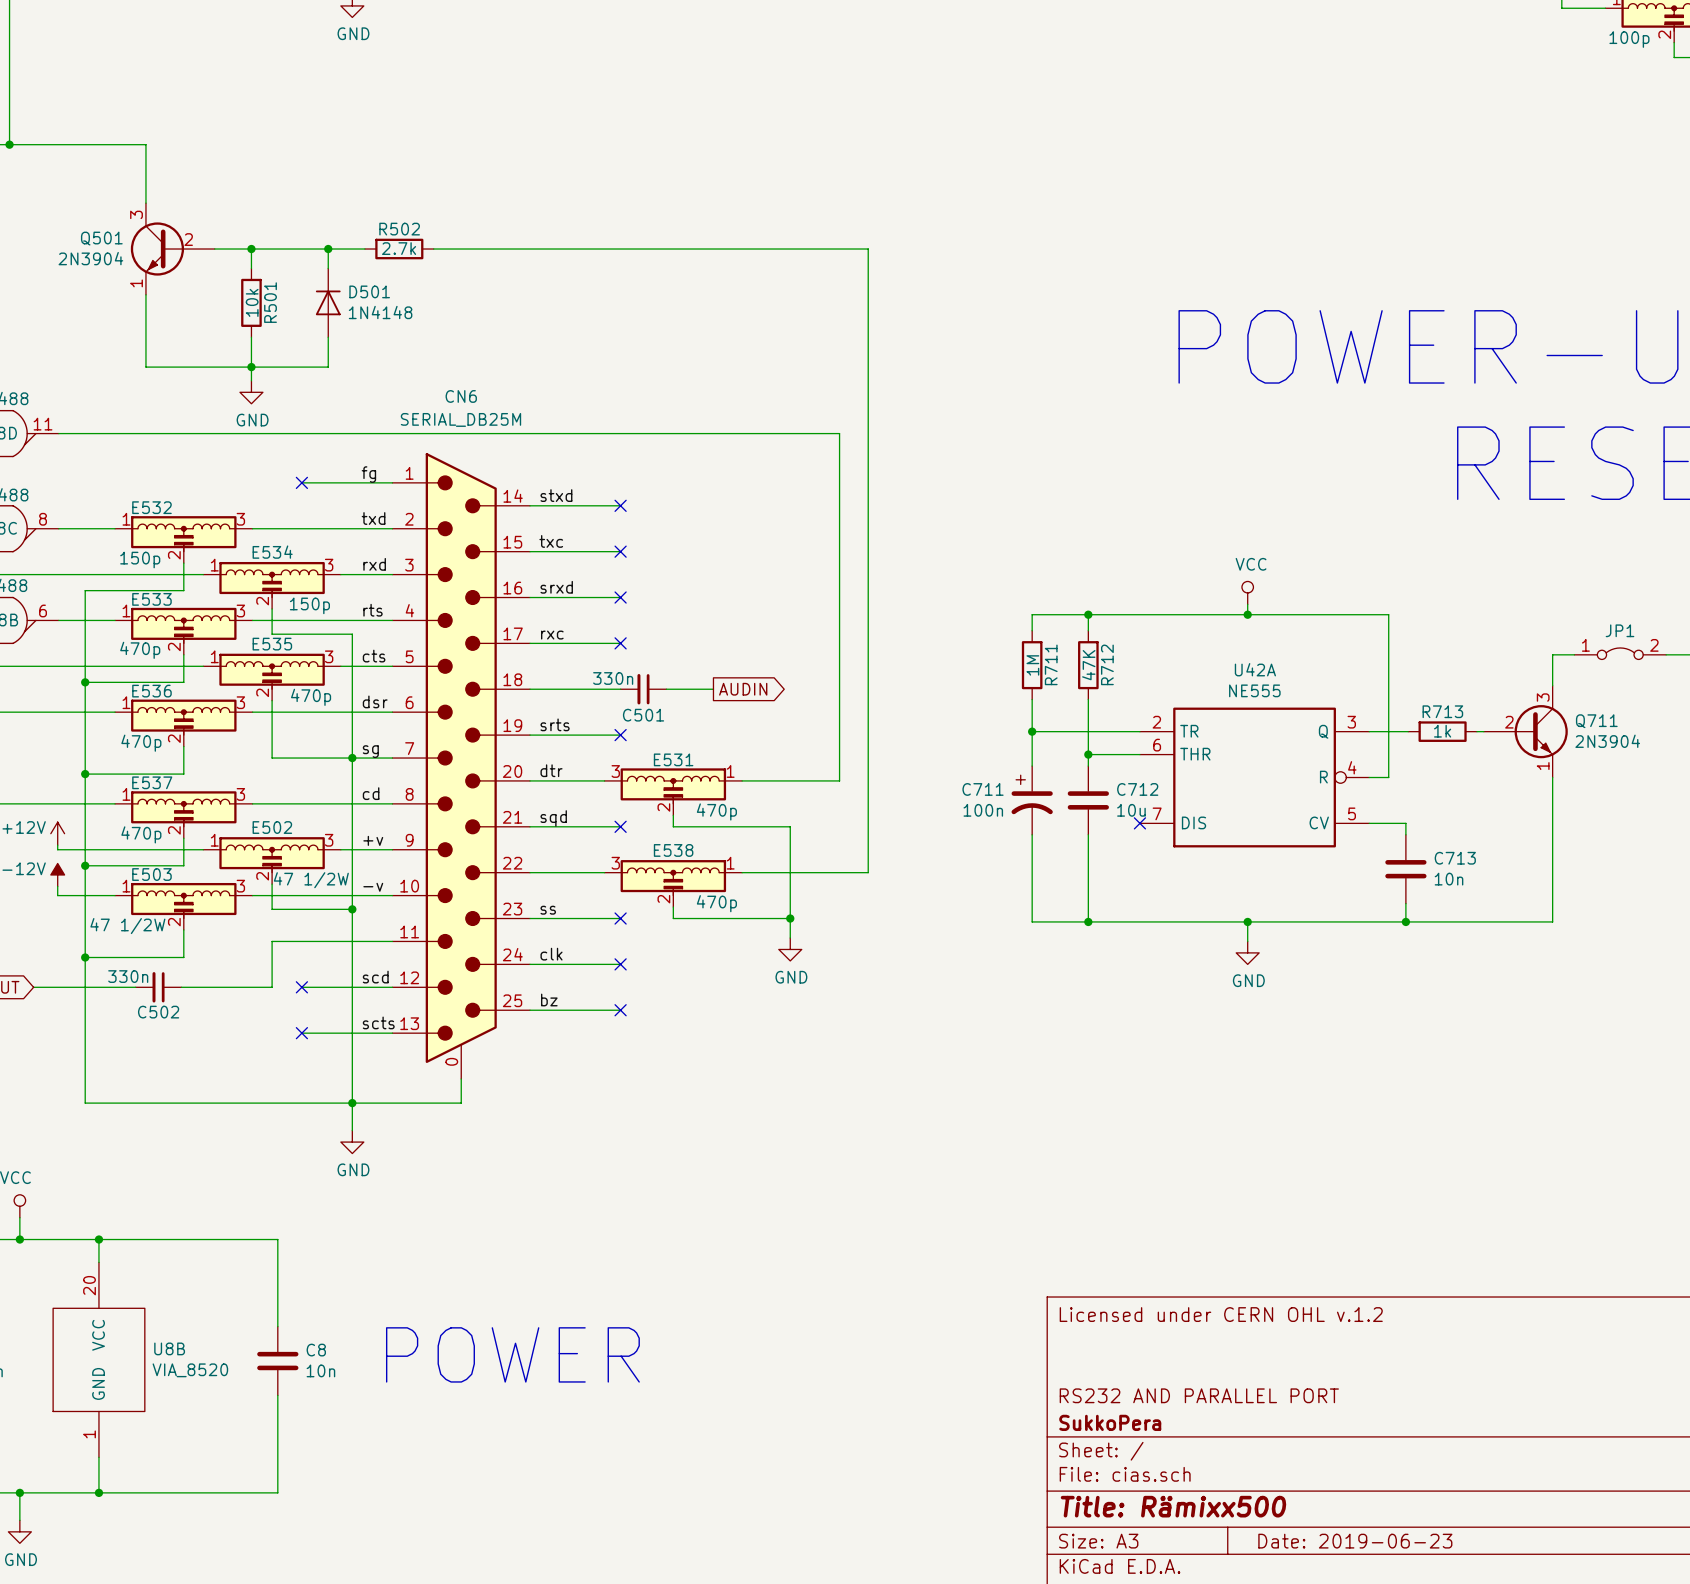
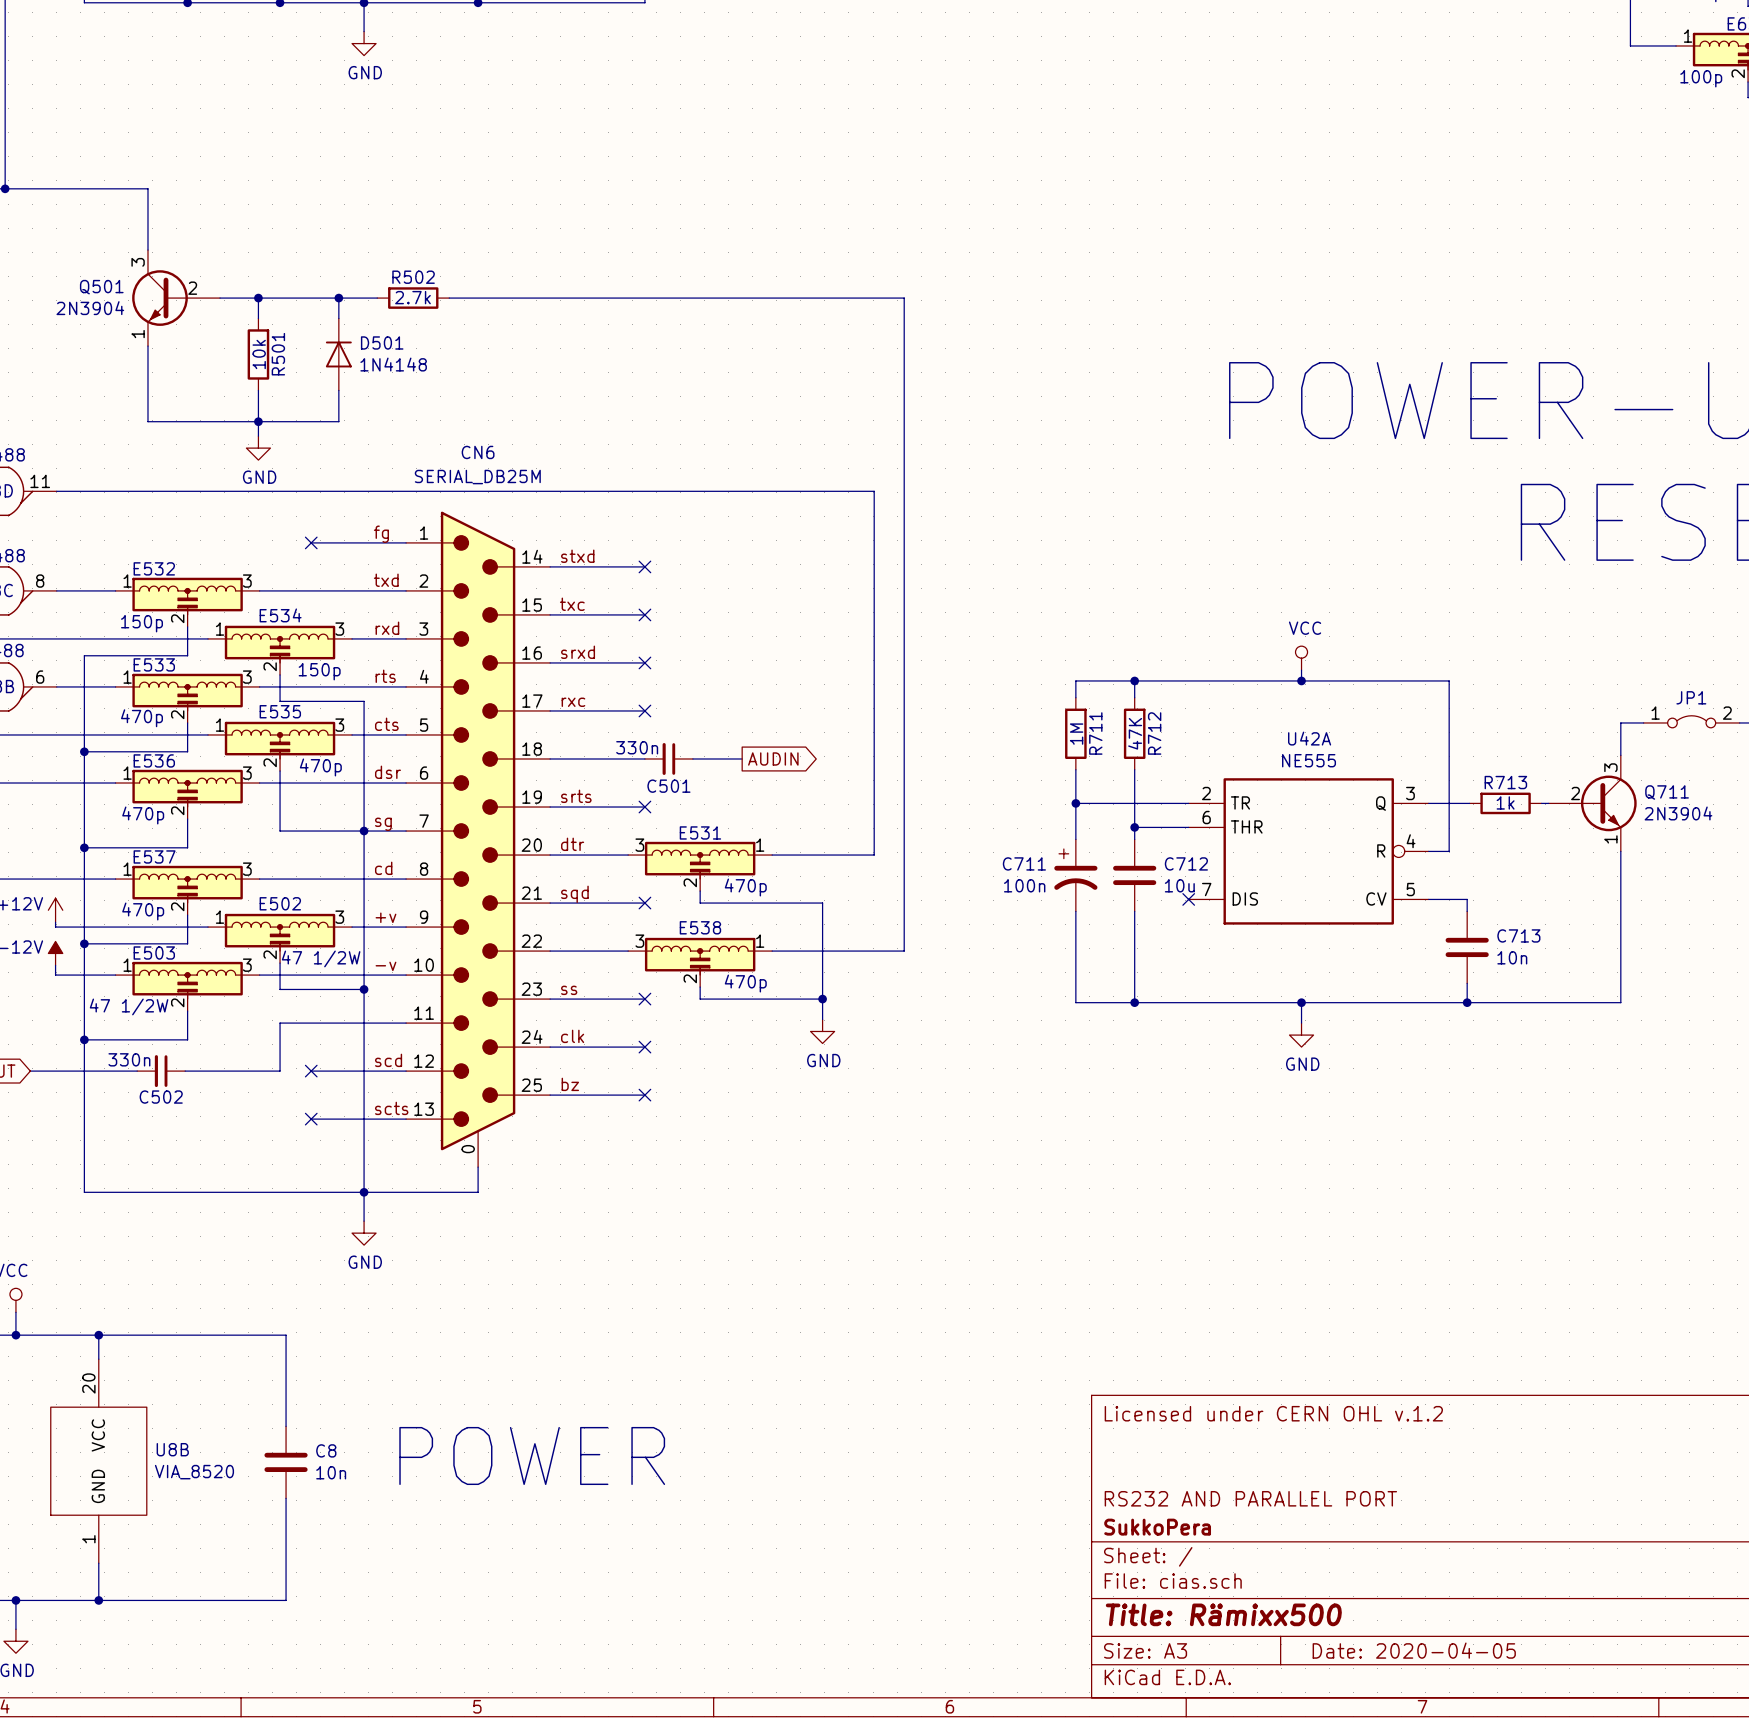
title block: Date: 2019-06-23 (1355, 1541) -> Date: 2020-04-05 (1414, 1650)

